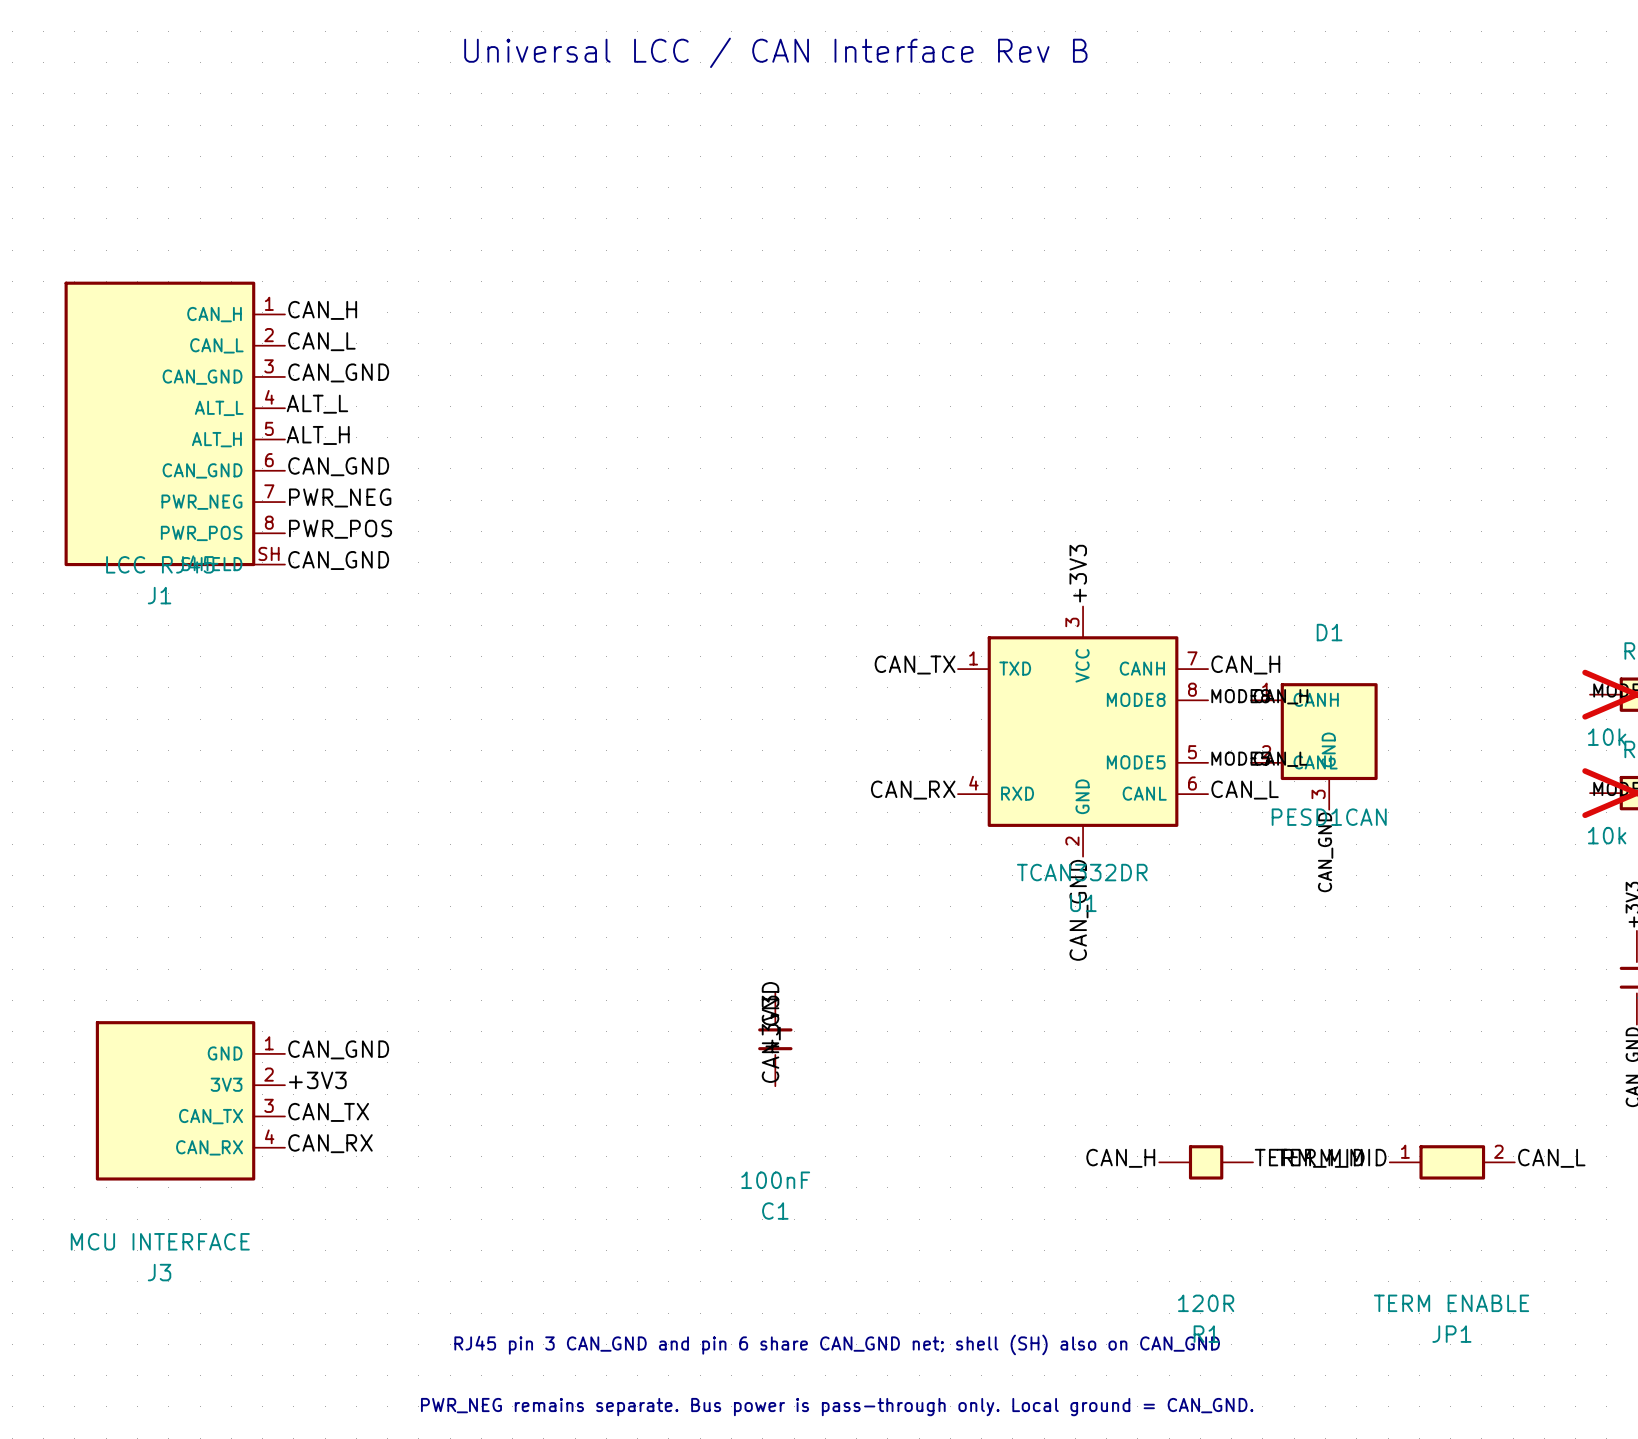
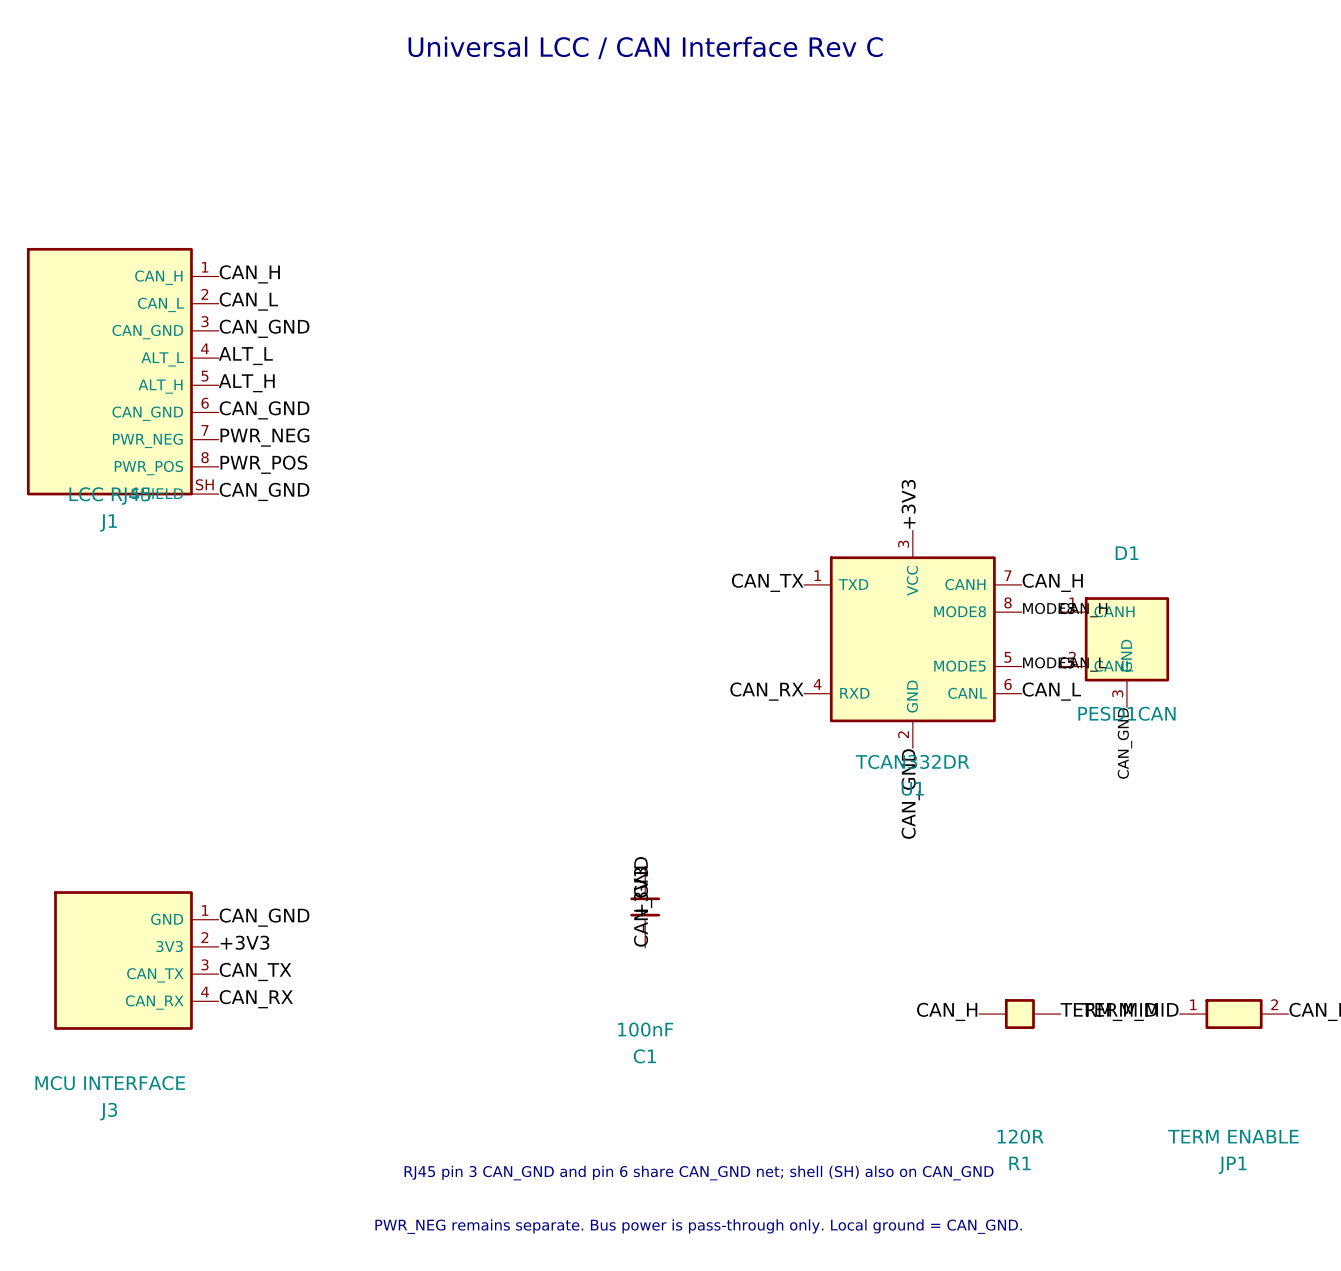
text: Universal LCC / CAN Interface Rev B (775, 52) -> Universal LCC / CAN Interface Rev C (645, 47)

